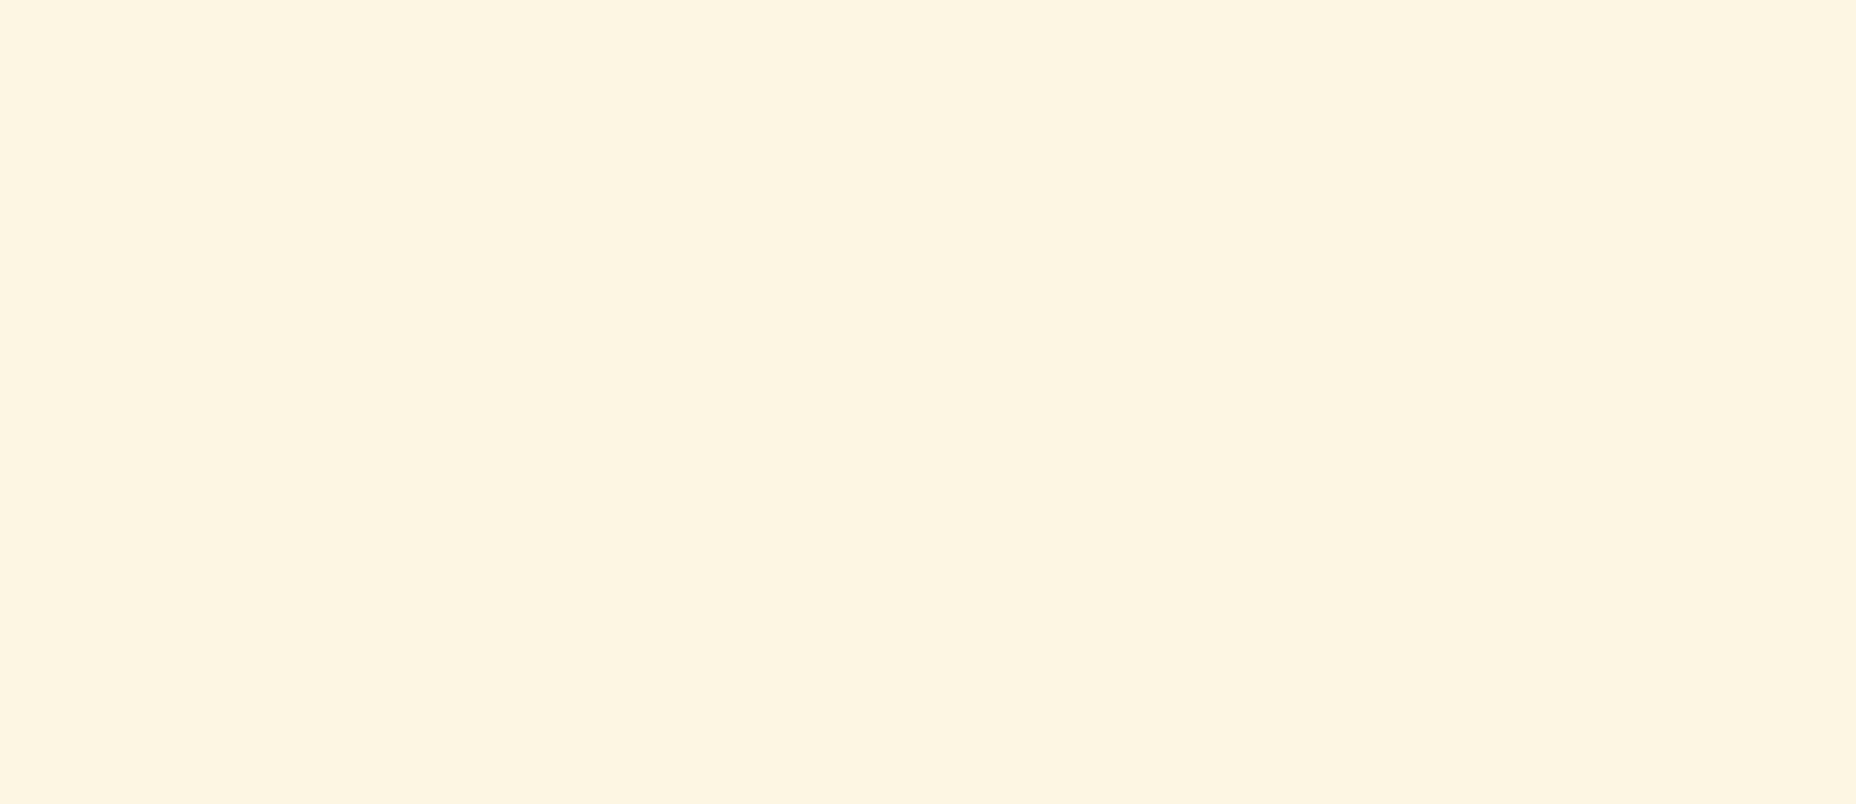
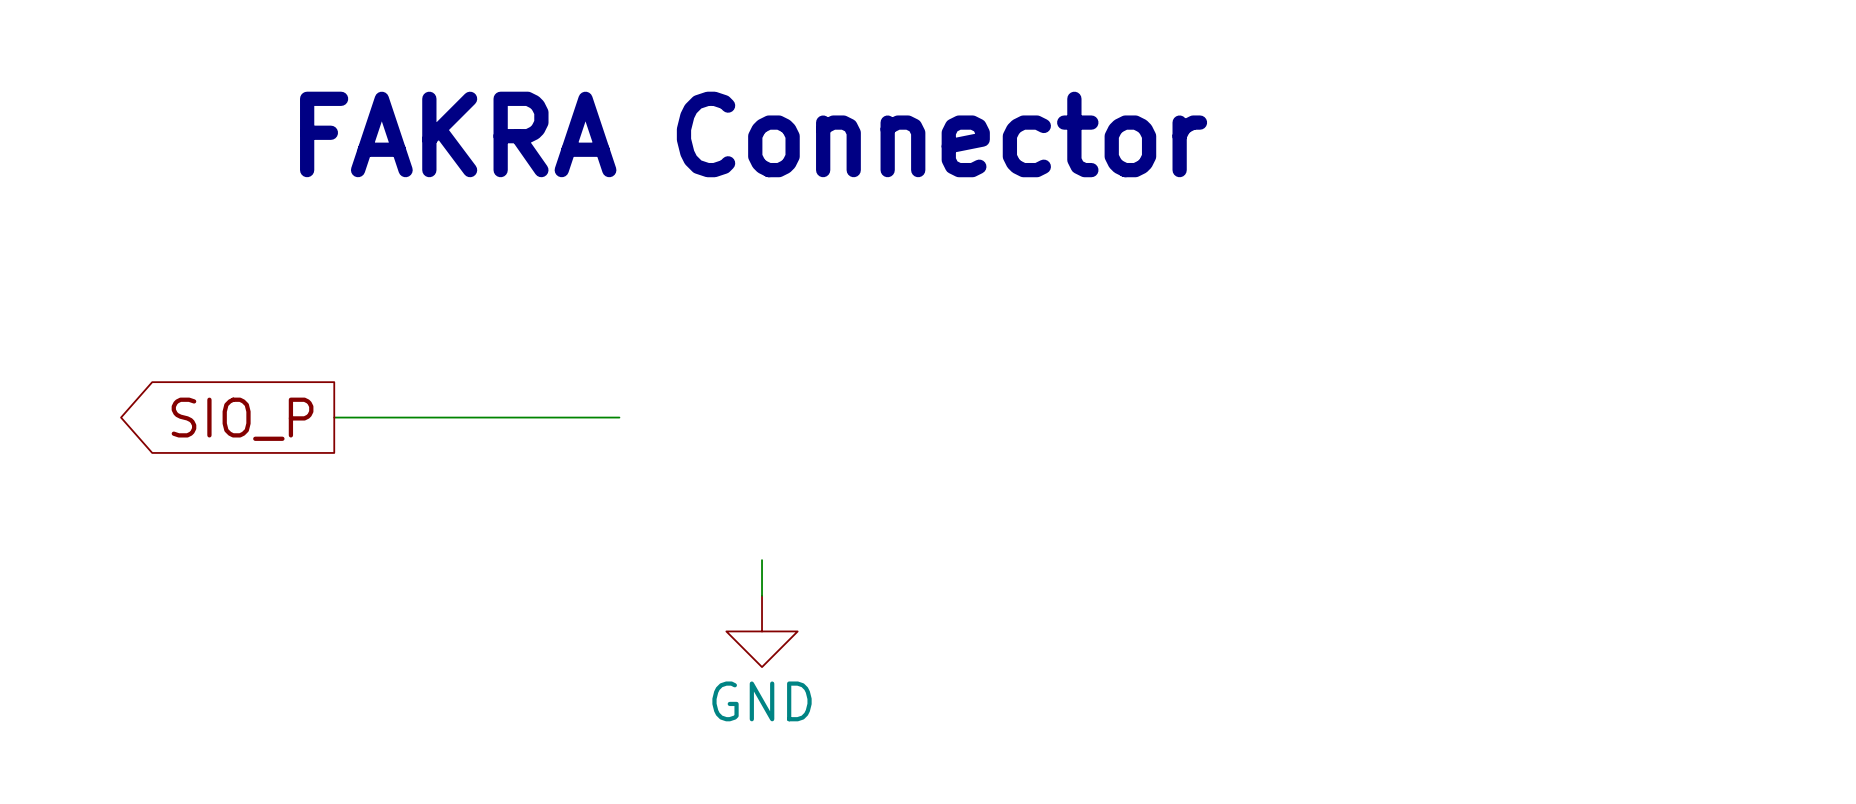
text: none -> FAKRA Connector (753, 134)
wire: none -> (334, 417) (619, 417)
global label: none -> SIO_P (242, 419)
wire: none -> (762, 560) (762, 595)
power symbol: none -> GND (762, 631)

